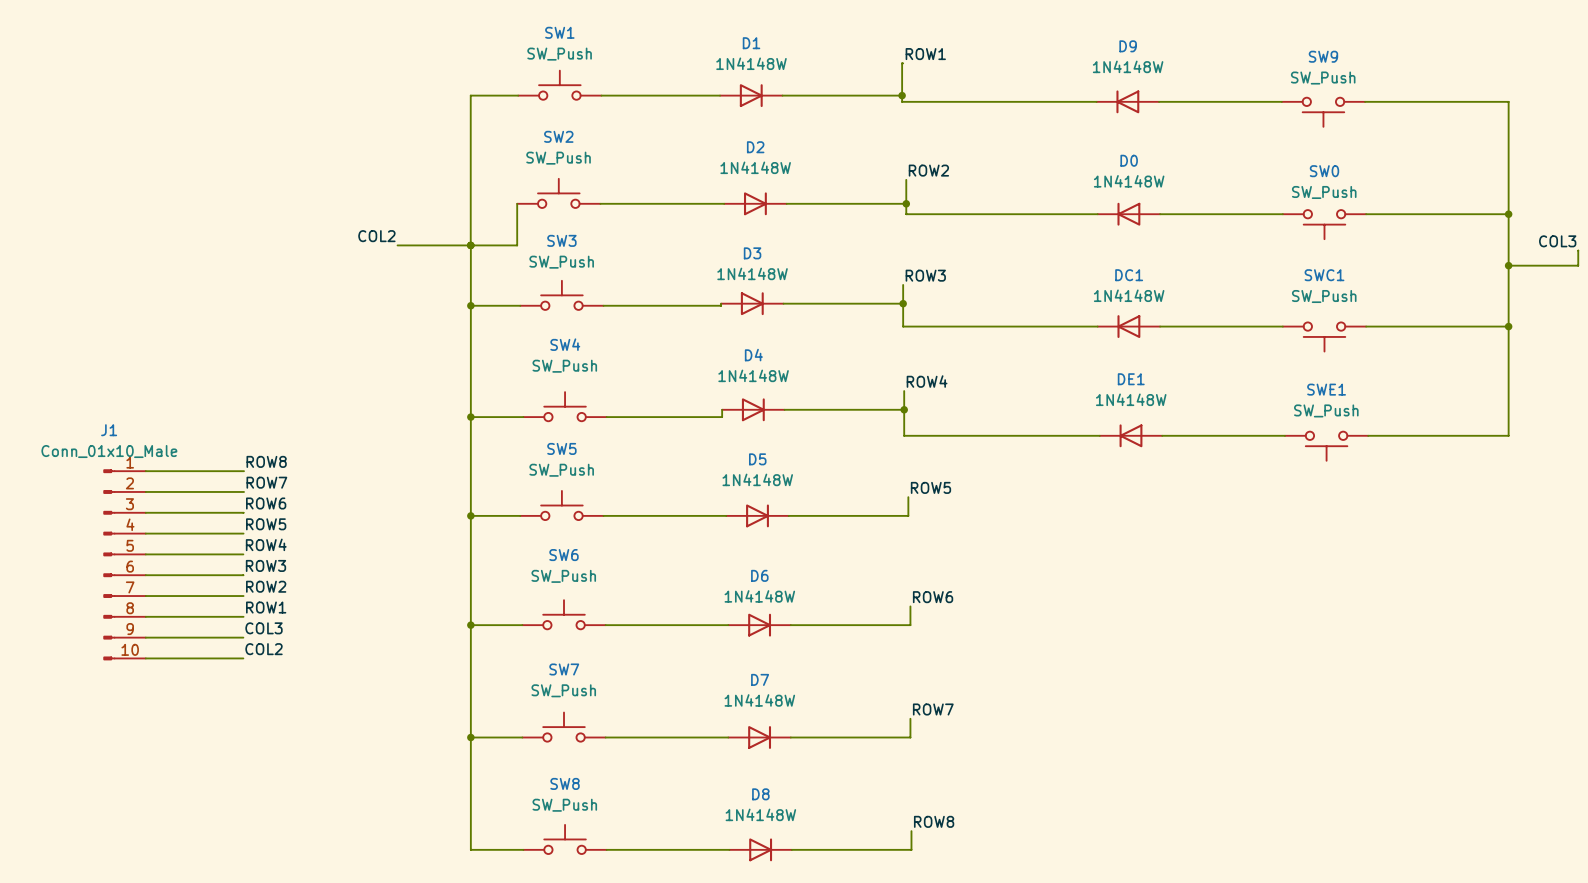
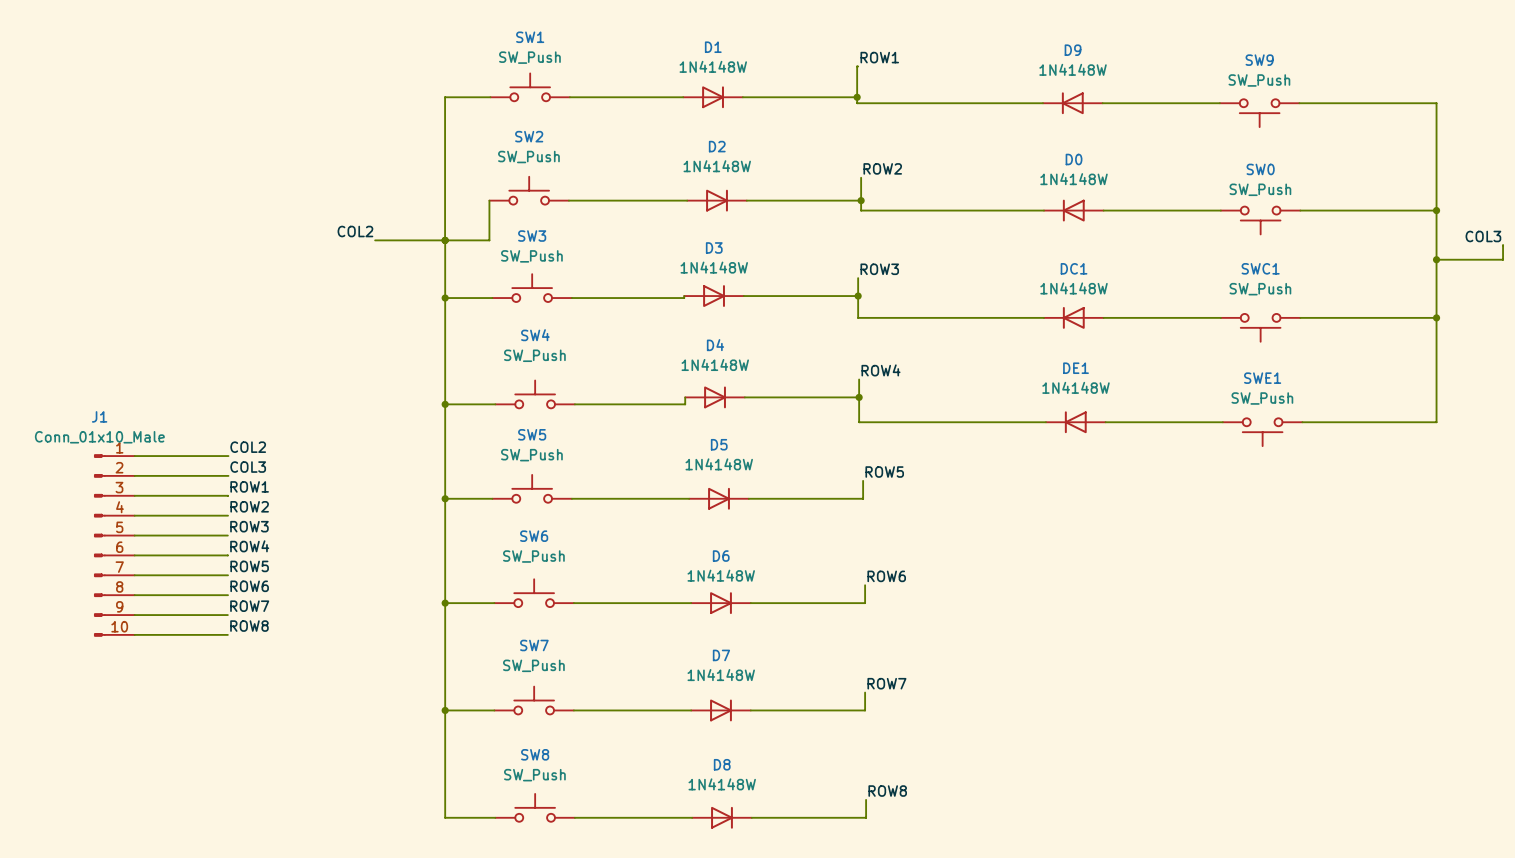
label: ROW8 (266, 461) -> COL2 (248, 447)
label: ROW7 (266, 482) -> COL3 (248, 467)
label: ROW6 (266, 503) -> ROW1 (249, 486)
label: ROW5 (266, 524) -> ROW2 (249, 506)
label: ROW4 (266, 544) -> ROW3 (249, 526)
label: ROW3 (265, 565) -> ROW4 (249, 546)
label: ROW2 (266, 586) -> ROW5 (249, 566)
label: ROW1 (266, 607) -> ROW6 (249, 586)
label: COL3 (264, 628) -> ROW7 (249, 606)
label: COL2 (264, 649) -> ROW8 (249, 626)

